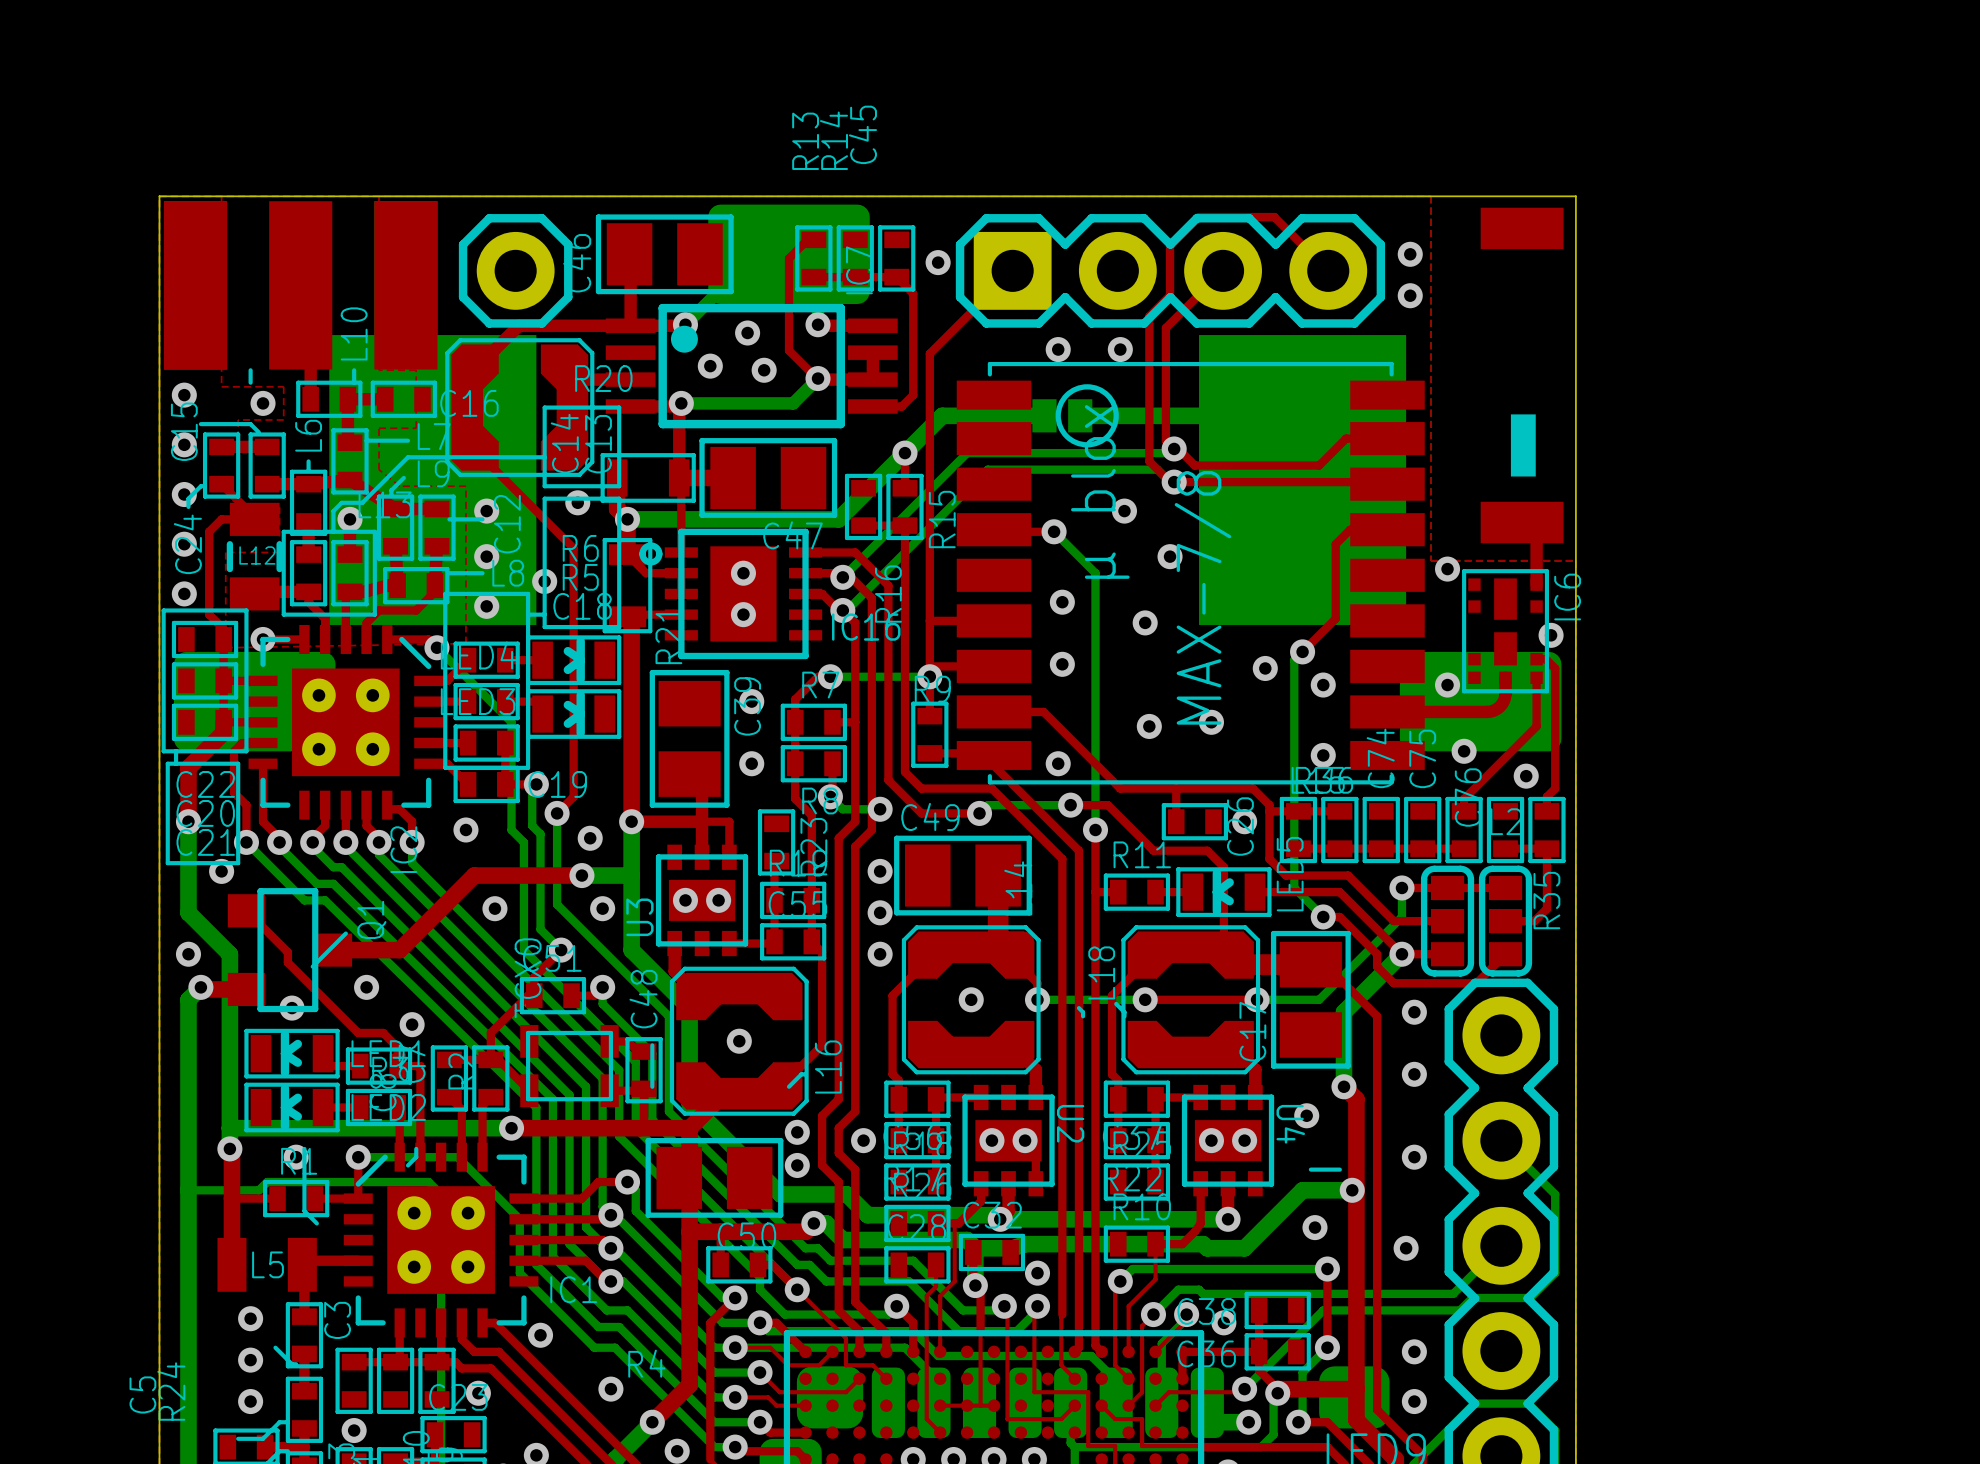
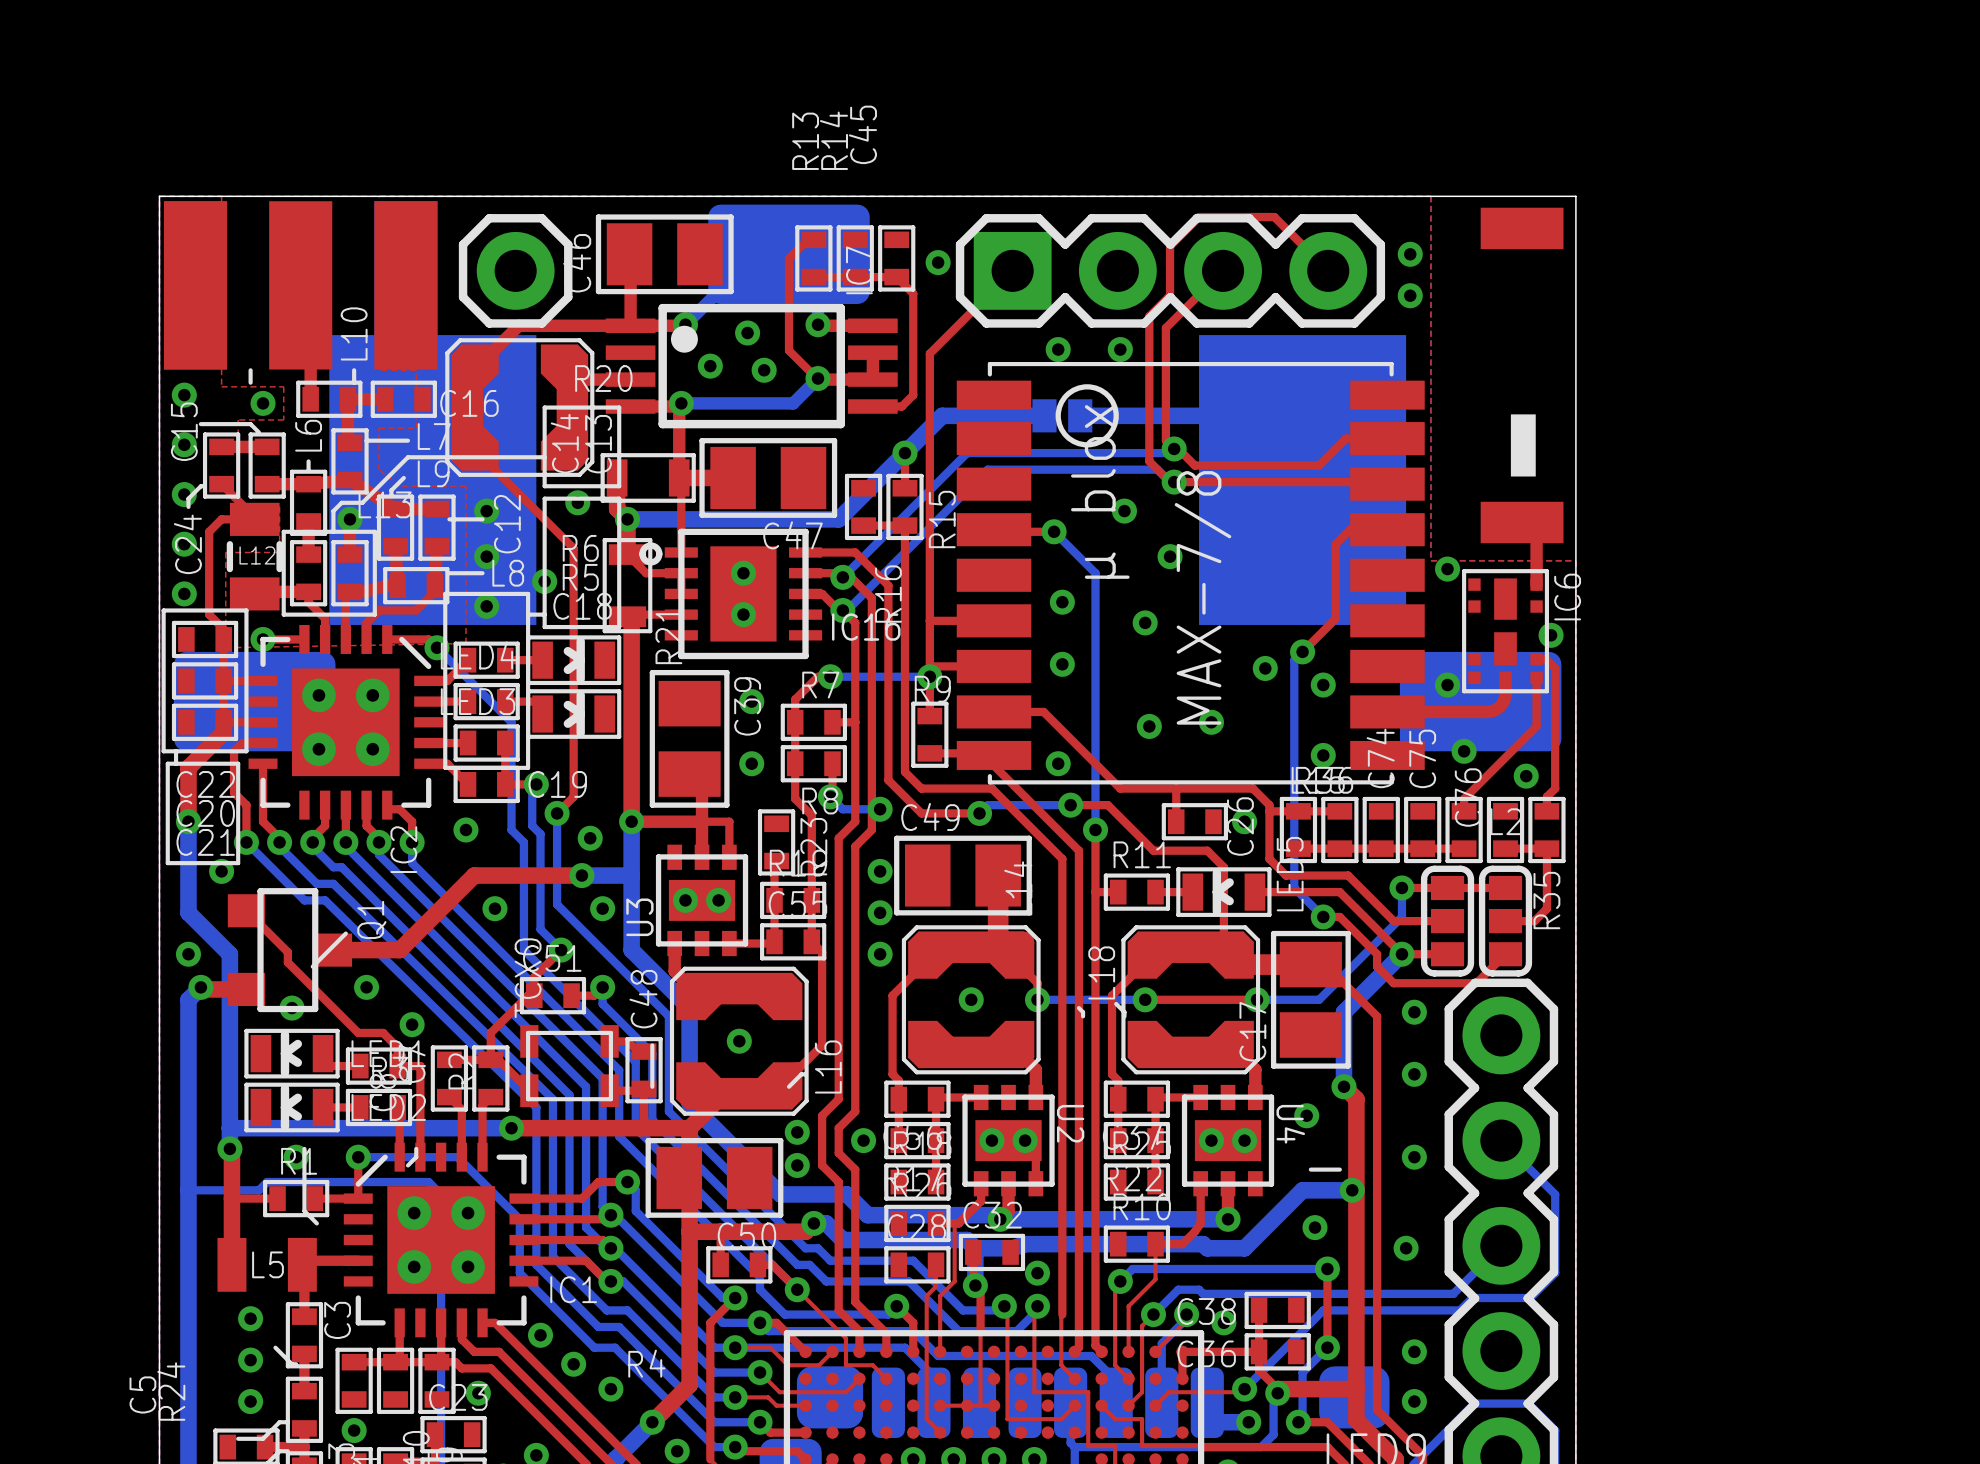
via: none -> (573, 1364)

